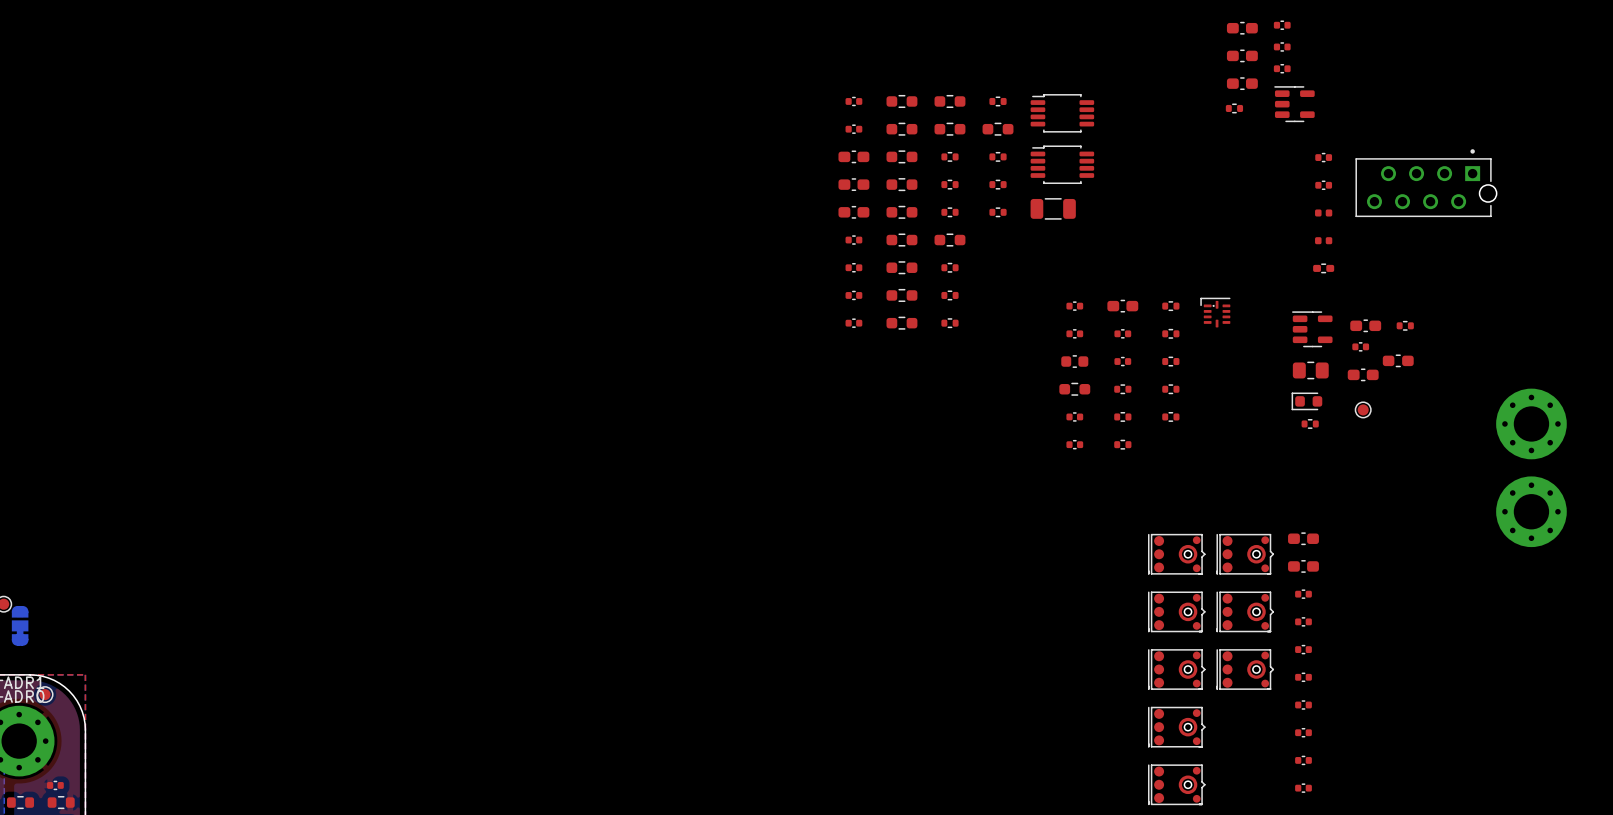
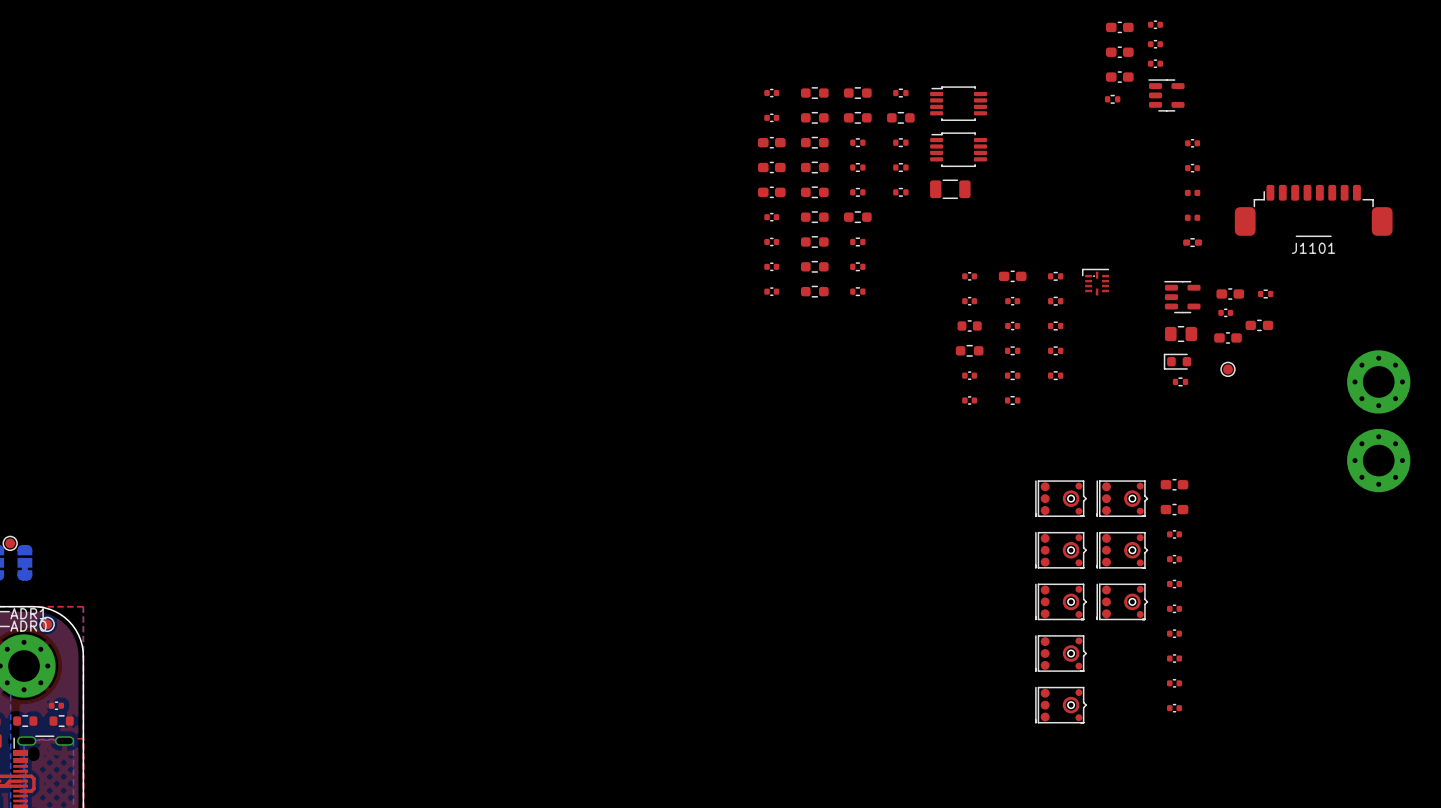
part: (1426, 183) -> none
J1101: none -> (1313, 210)

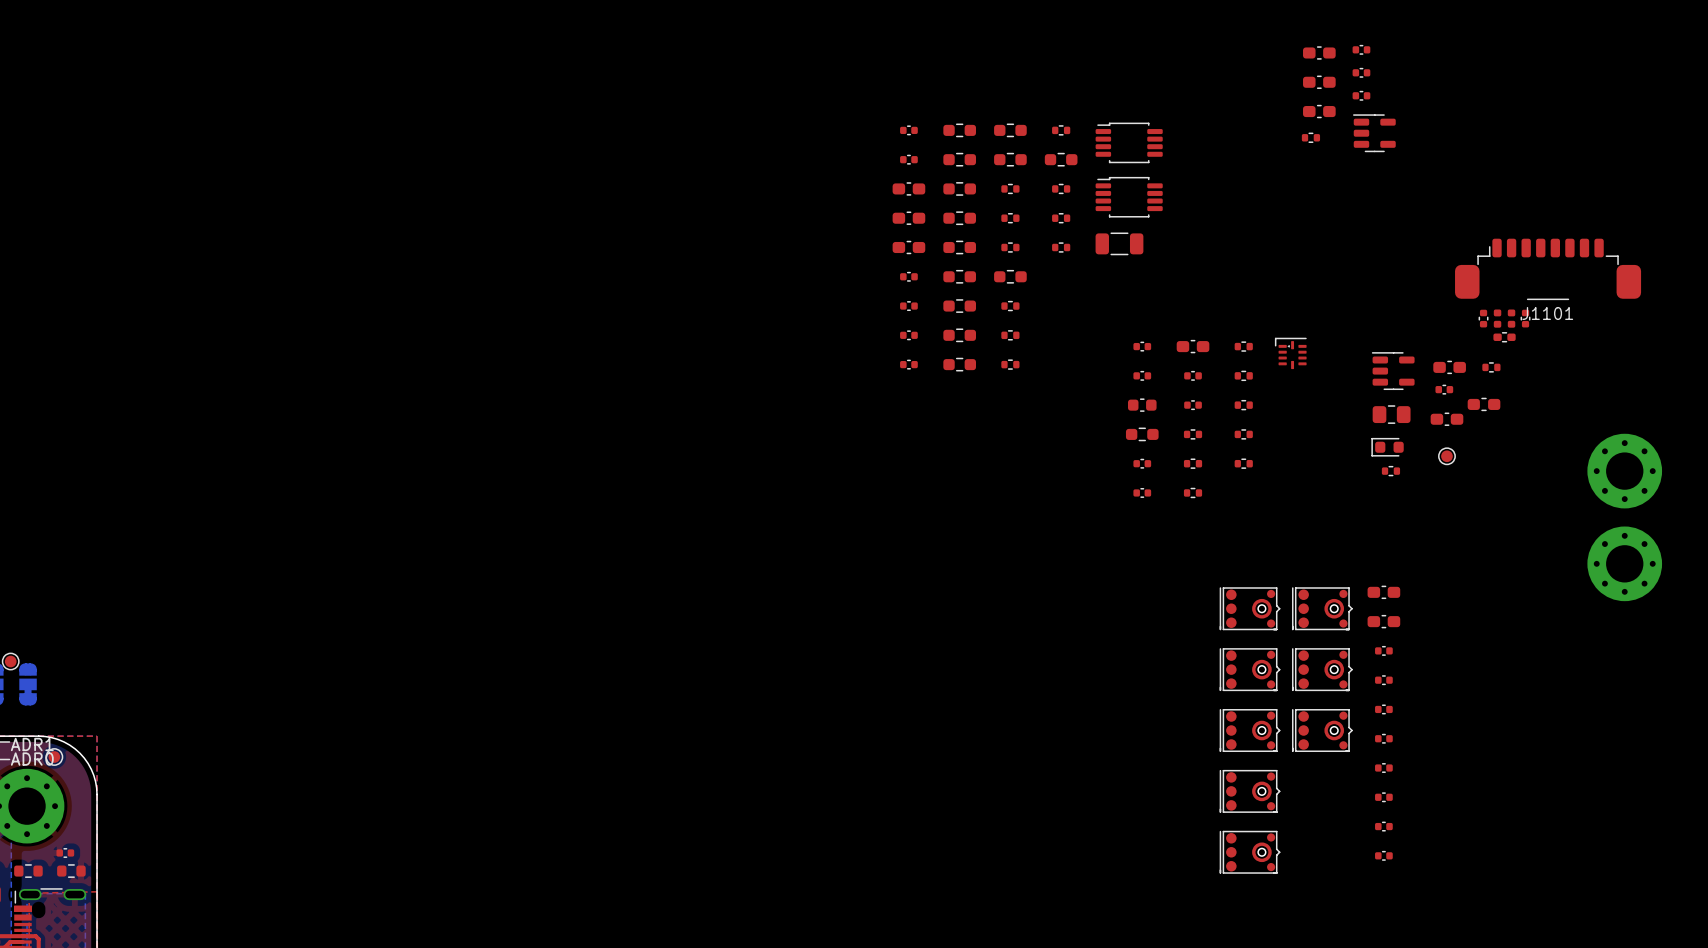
part: (1192, 143) -> none
part: (1192, 168) -> none
part: (1192, 192) -> none
part: (1192, 217) -> none
part position: (1192, 242) -> (1504, 337)
part: none -> (1483, 318)
part: none -> (1497, 318)
part: none -> (1511, 318)
part: none -> (1525, 318)

